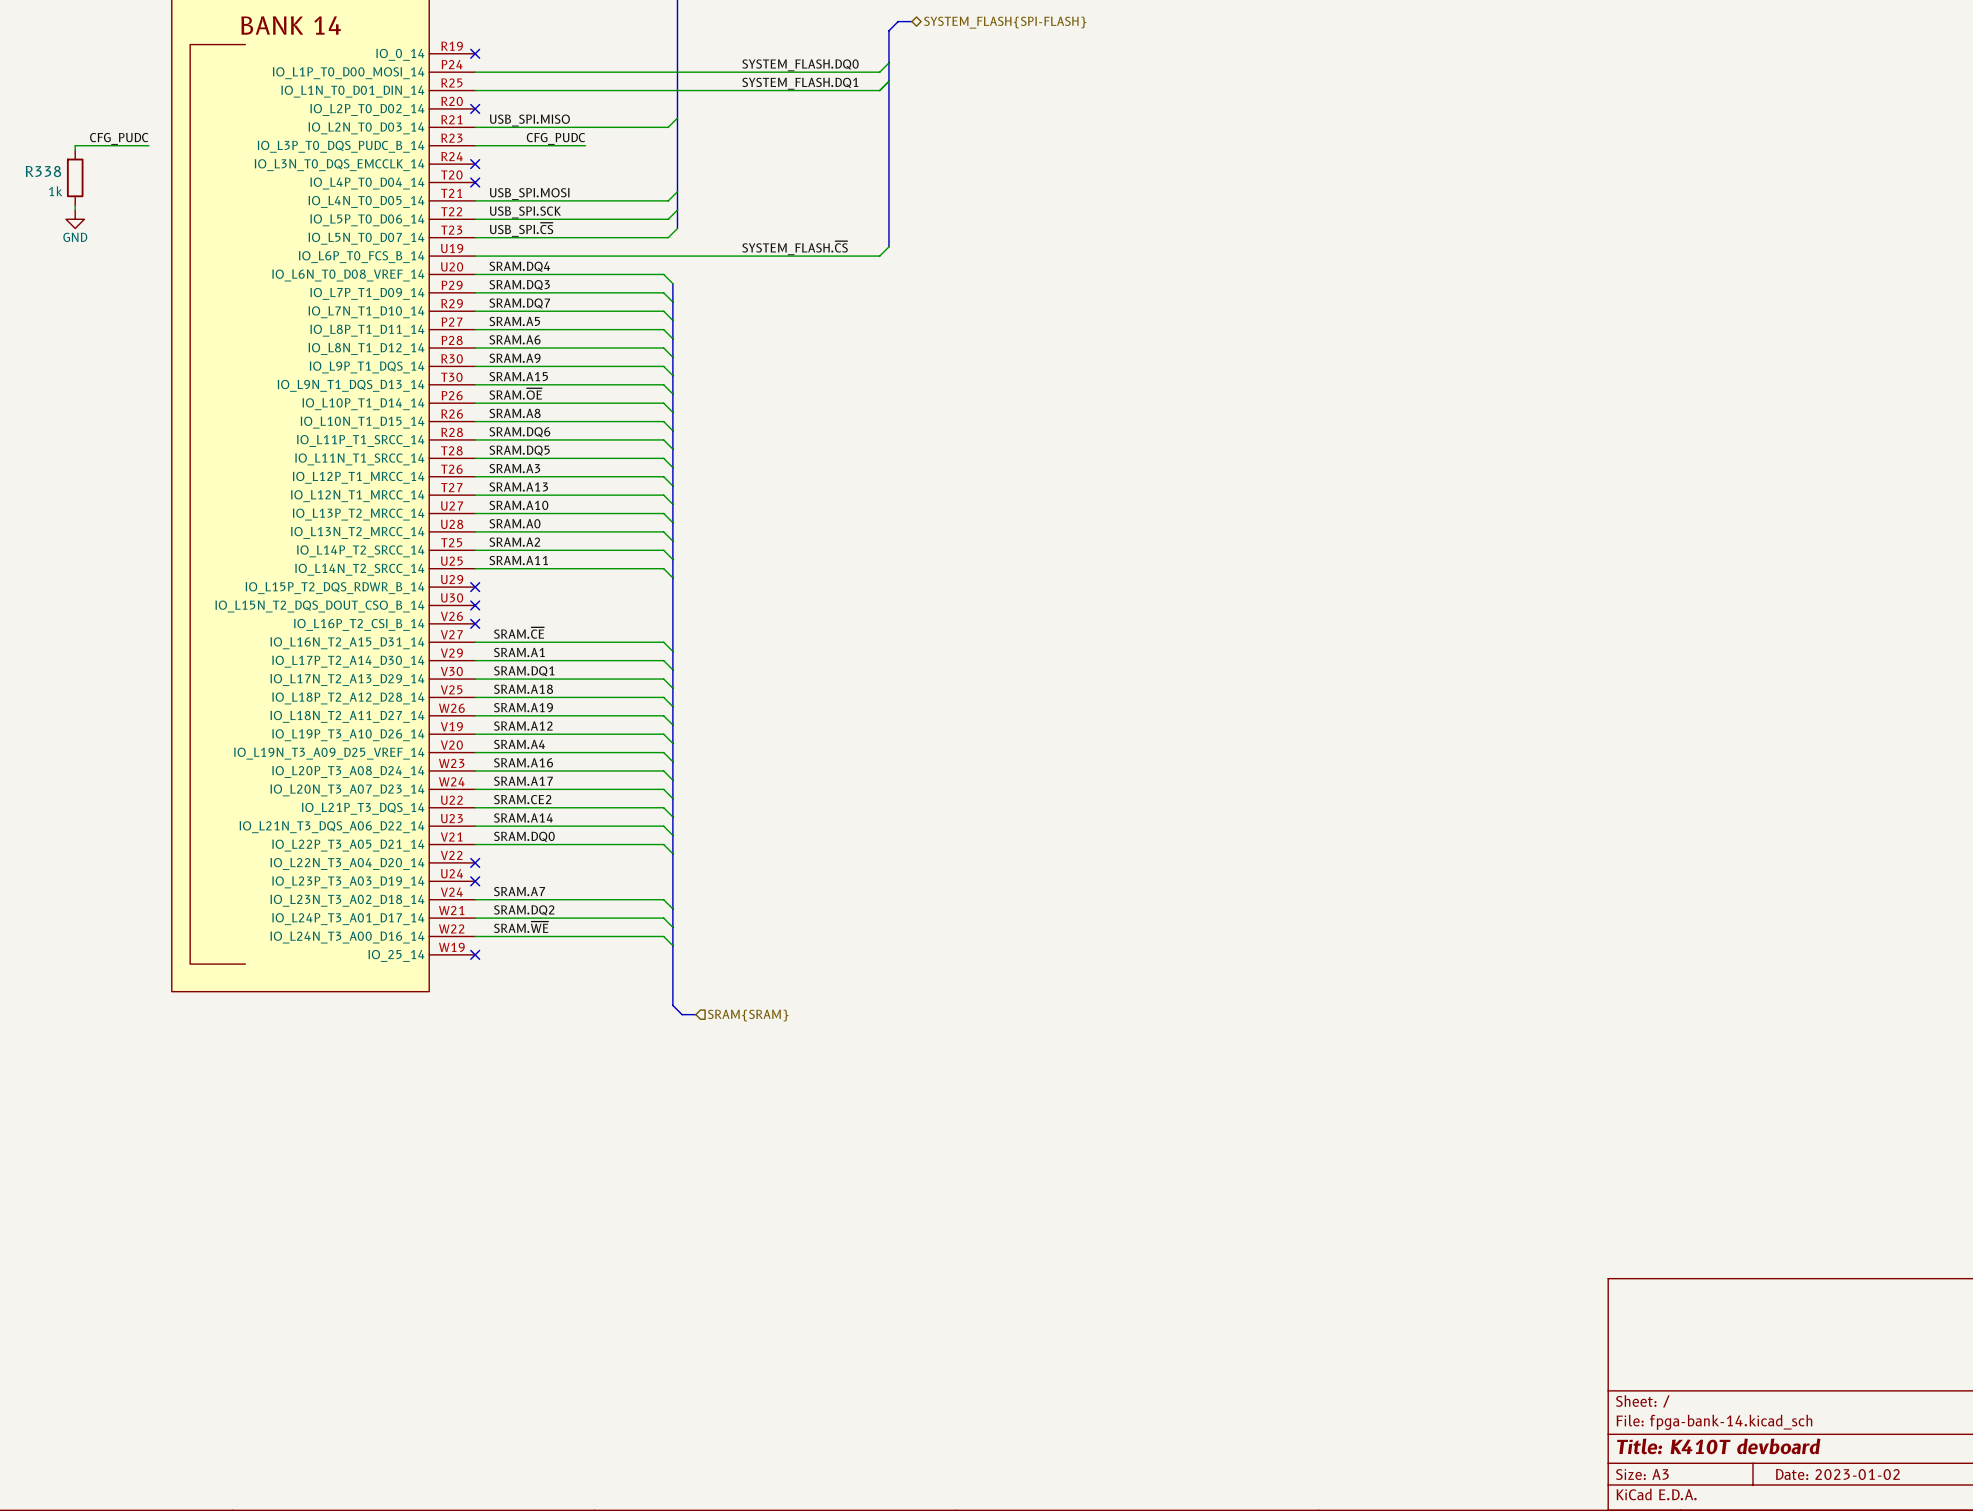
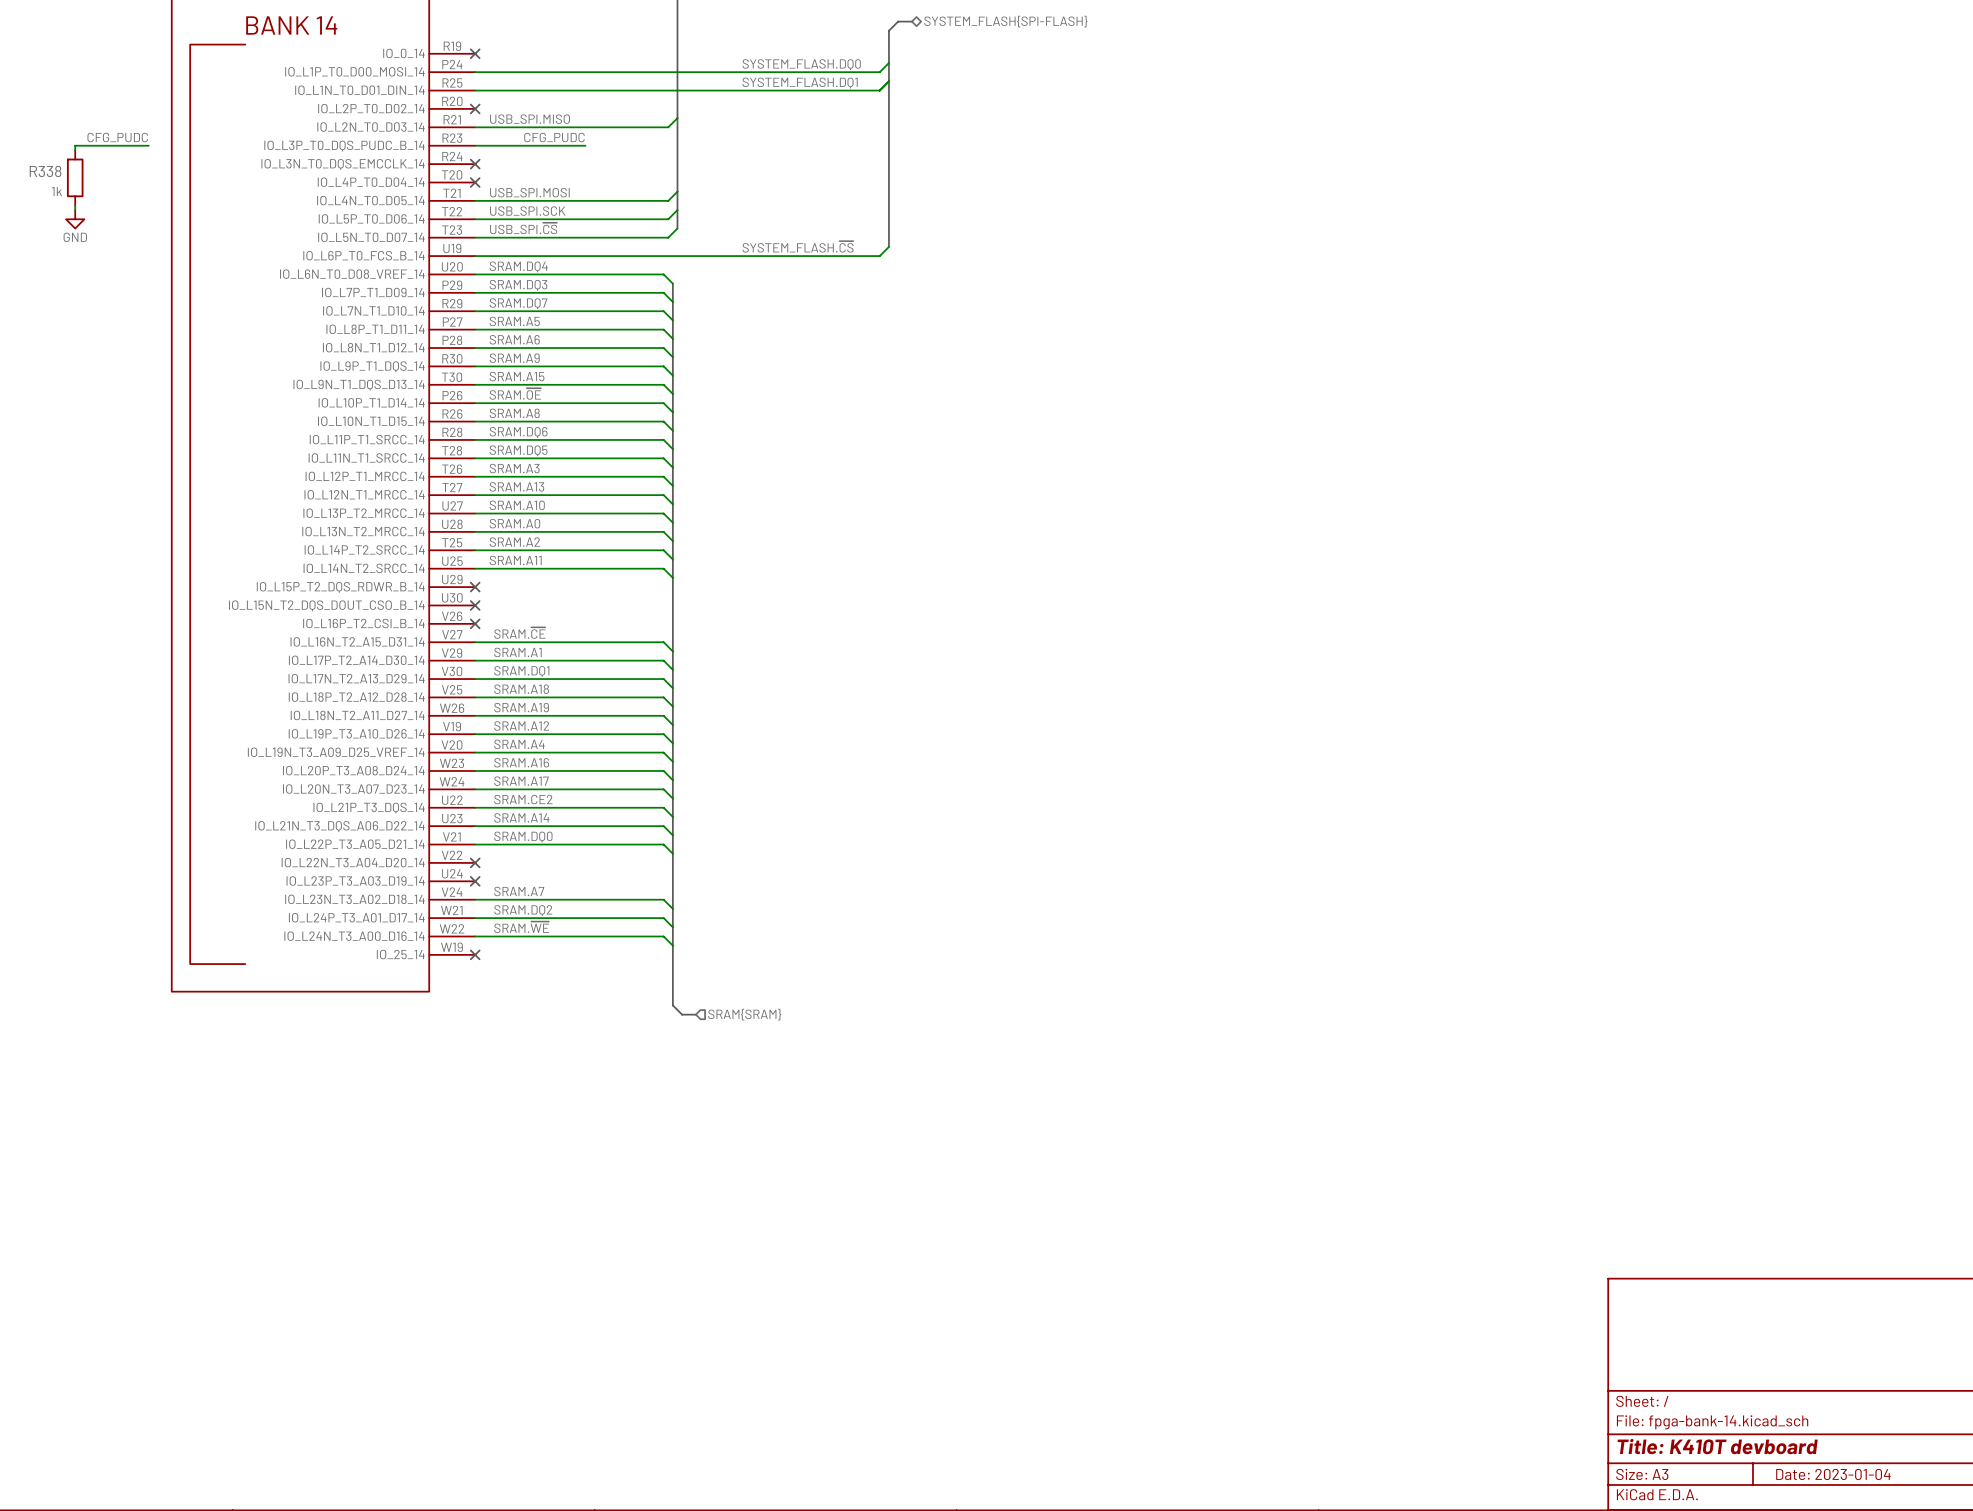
title block: Date: 2023-01-02 (1837, 1474) -> Date: 2023-01-04 (1833, 1474)

